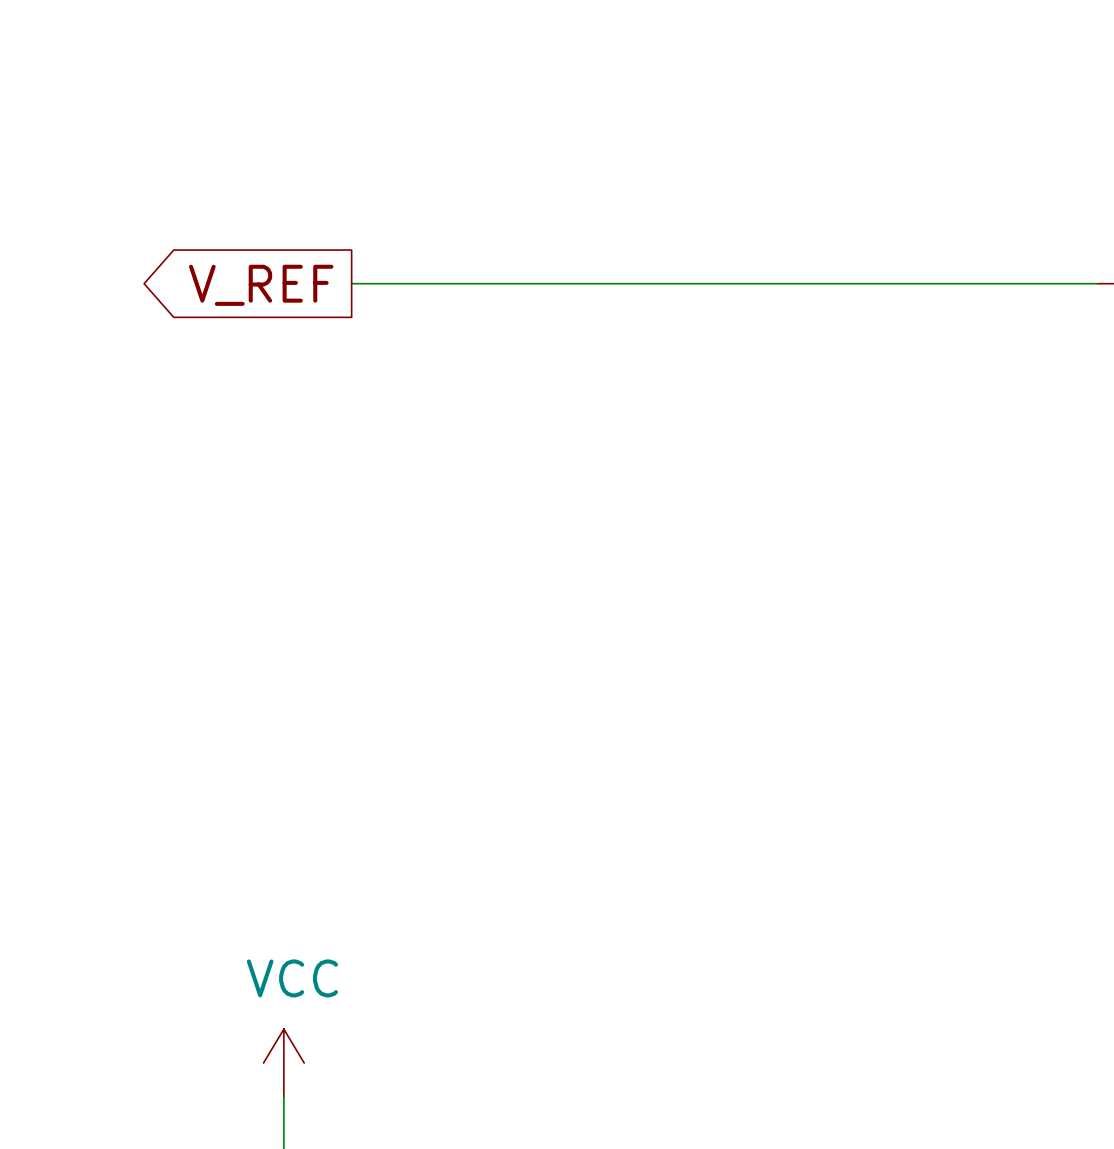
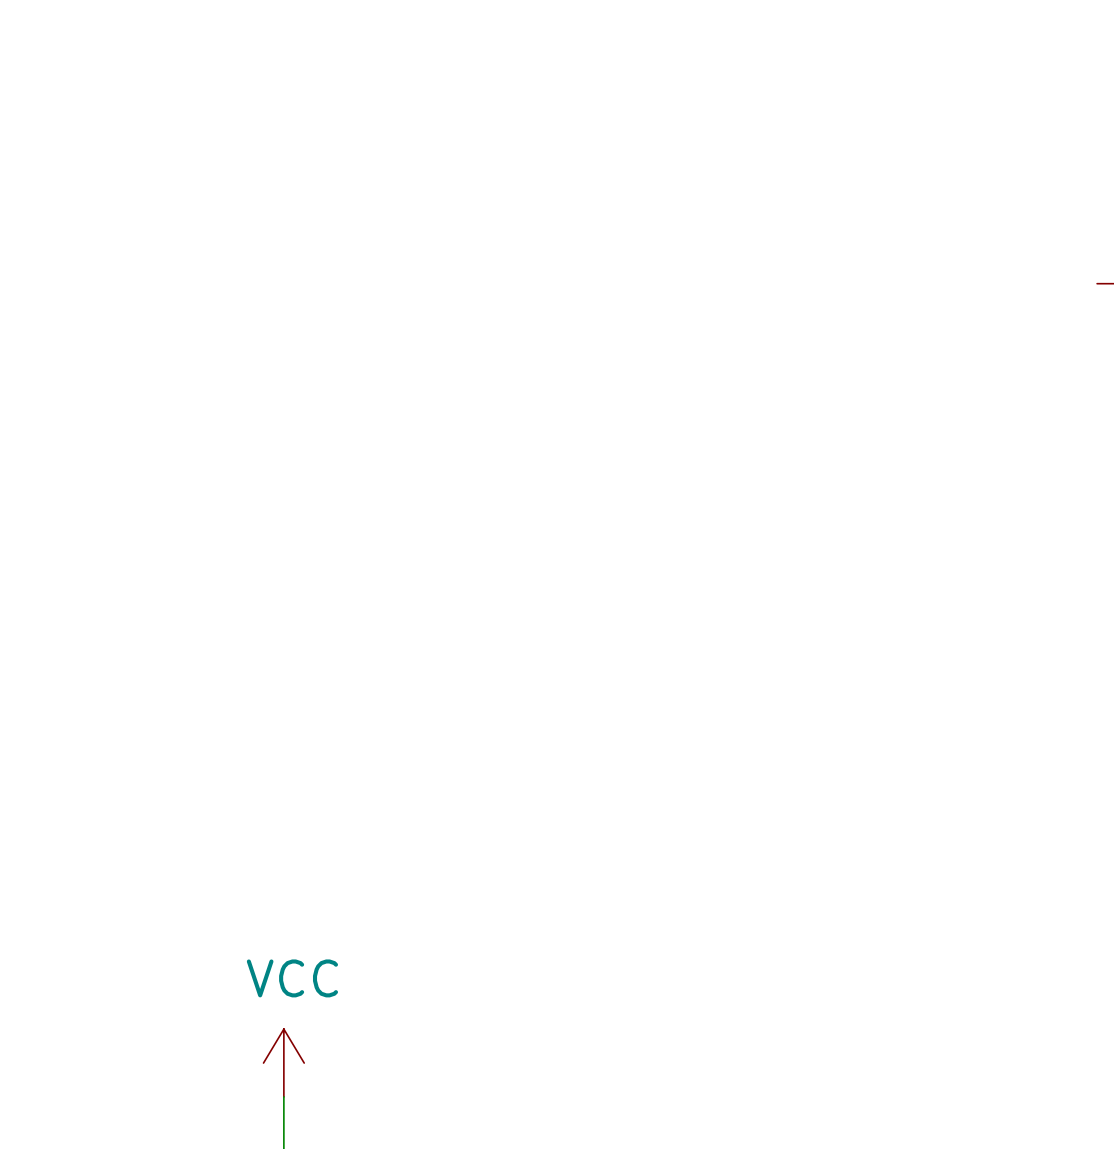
wire: (351, 283) (1097, 283) -> none
global label: V_REF (261, 285) -> none

